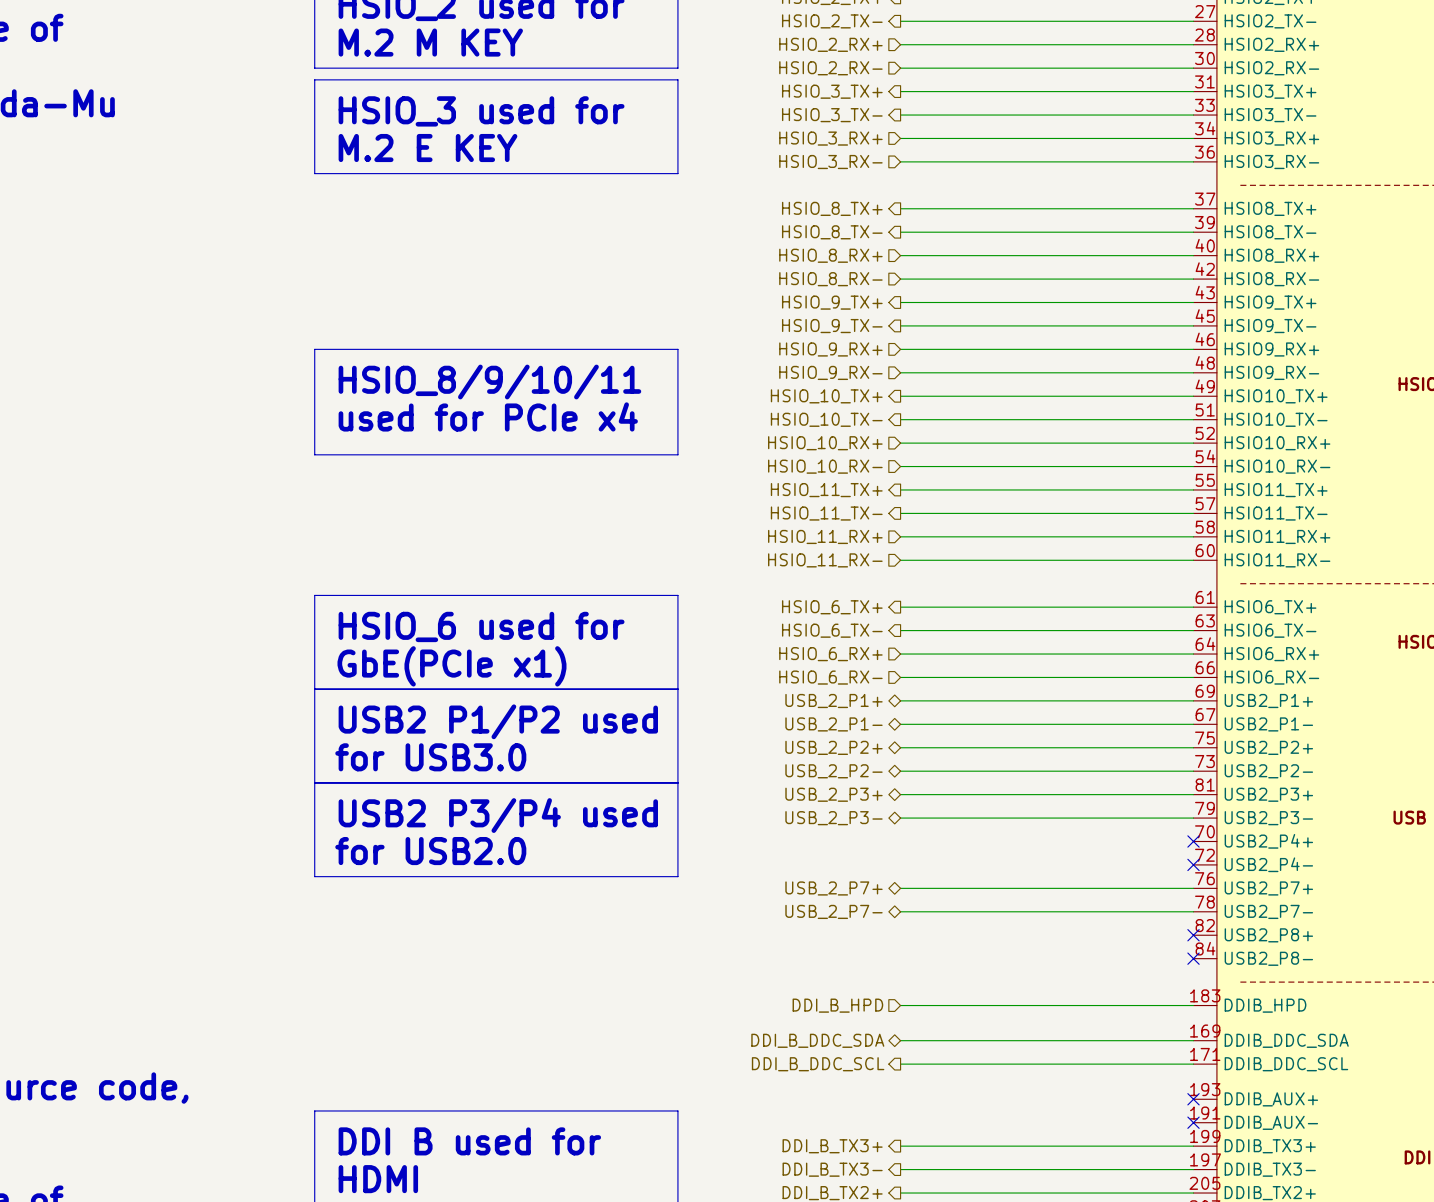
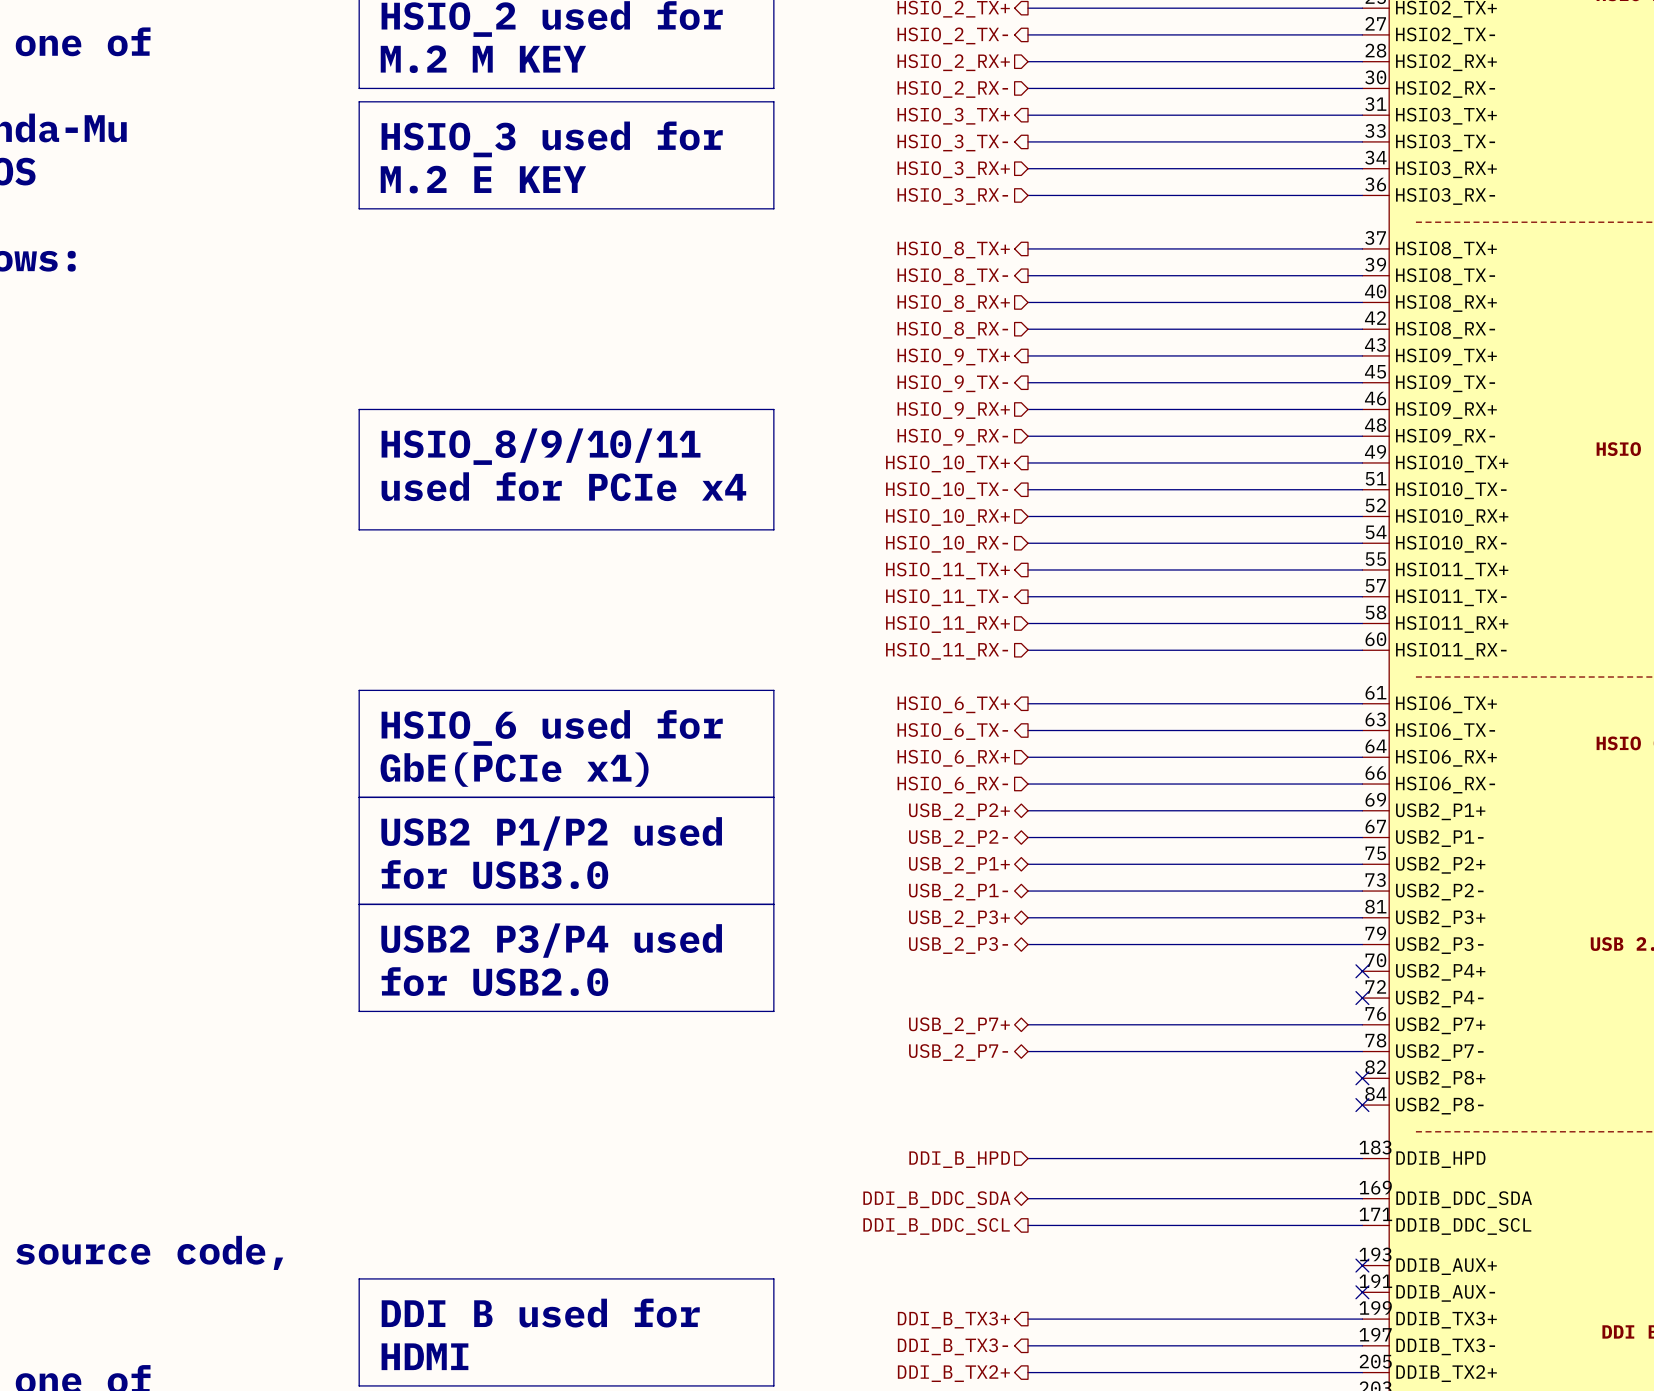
hierarchical label: USB_2_P1+ (833, 701) -> USB_2_P2+ (959, 811)
hierarchical label: USB_2_P1- (833, 724) -> USB_2_P2- (958, 838)
hierarchical label: USB_2_P2+ (833, 747) -> USB_2_P1+ (959, 865)
hierarchical label: USB_2_P2- (833, 771) -> USB_2_P1- (958, 892)

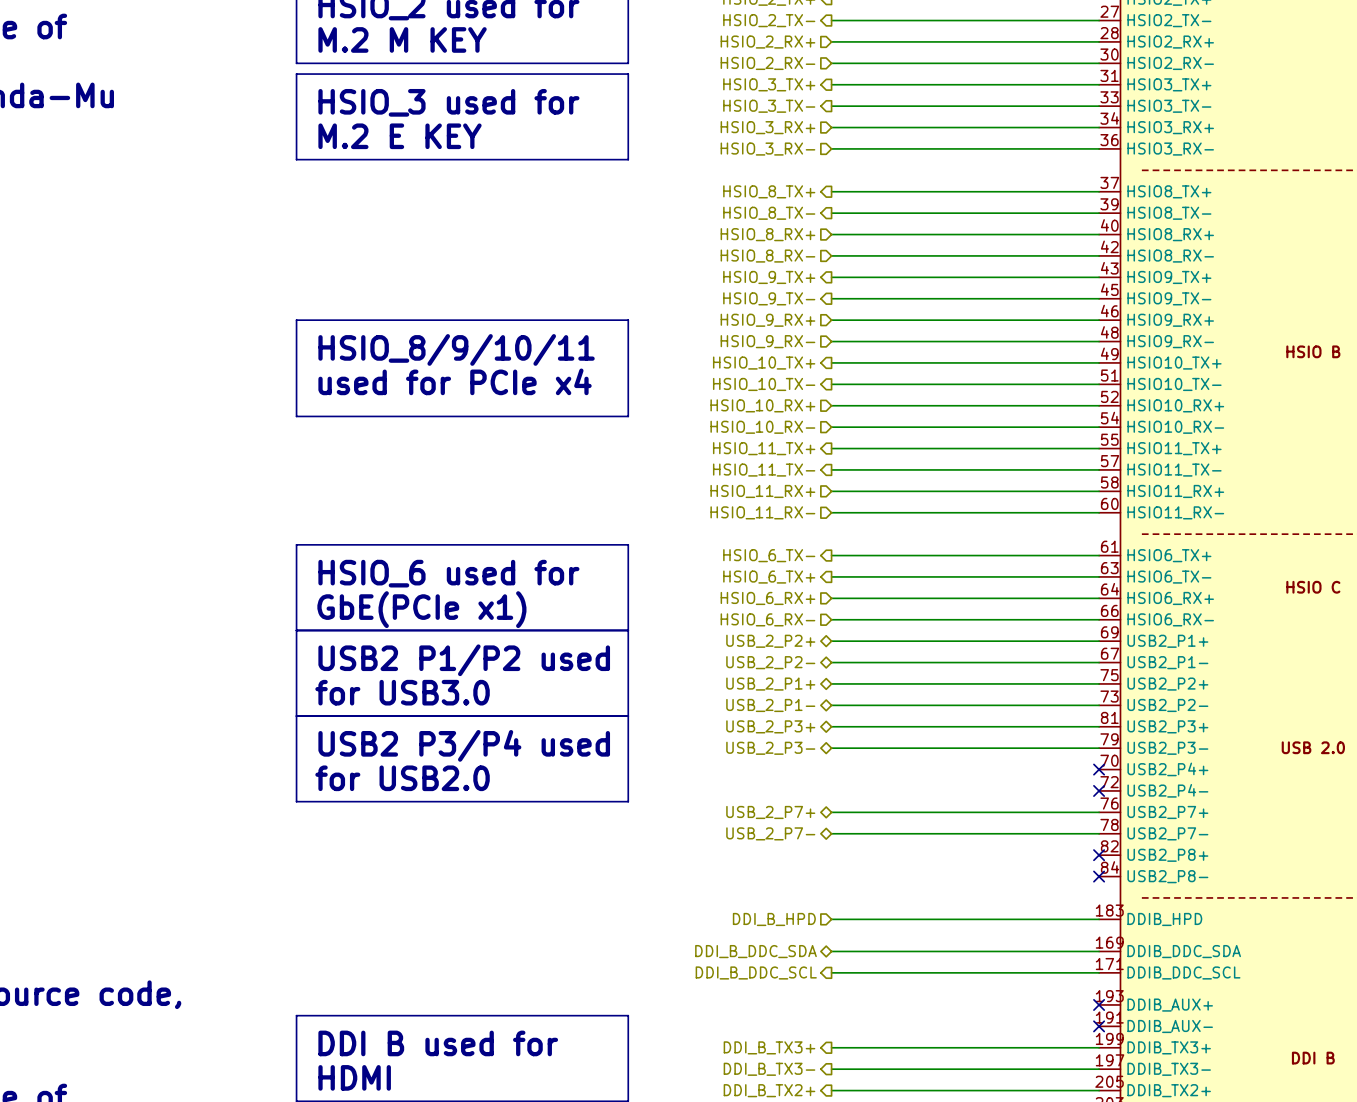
hierarchical label: HSIO_6_TX+ (953, 704) -> HSIO_6_TX- (769, 555)
hierarchical label: HSIO_6_TX- (952, 731) -> HSIO_6_TX+ (769, 577)

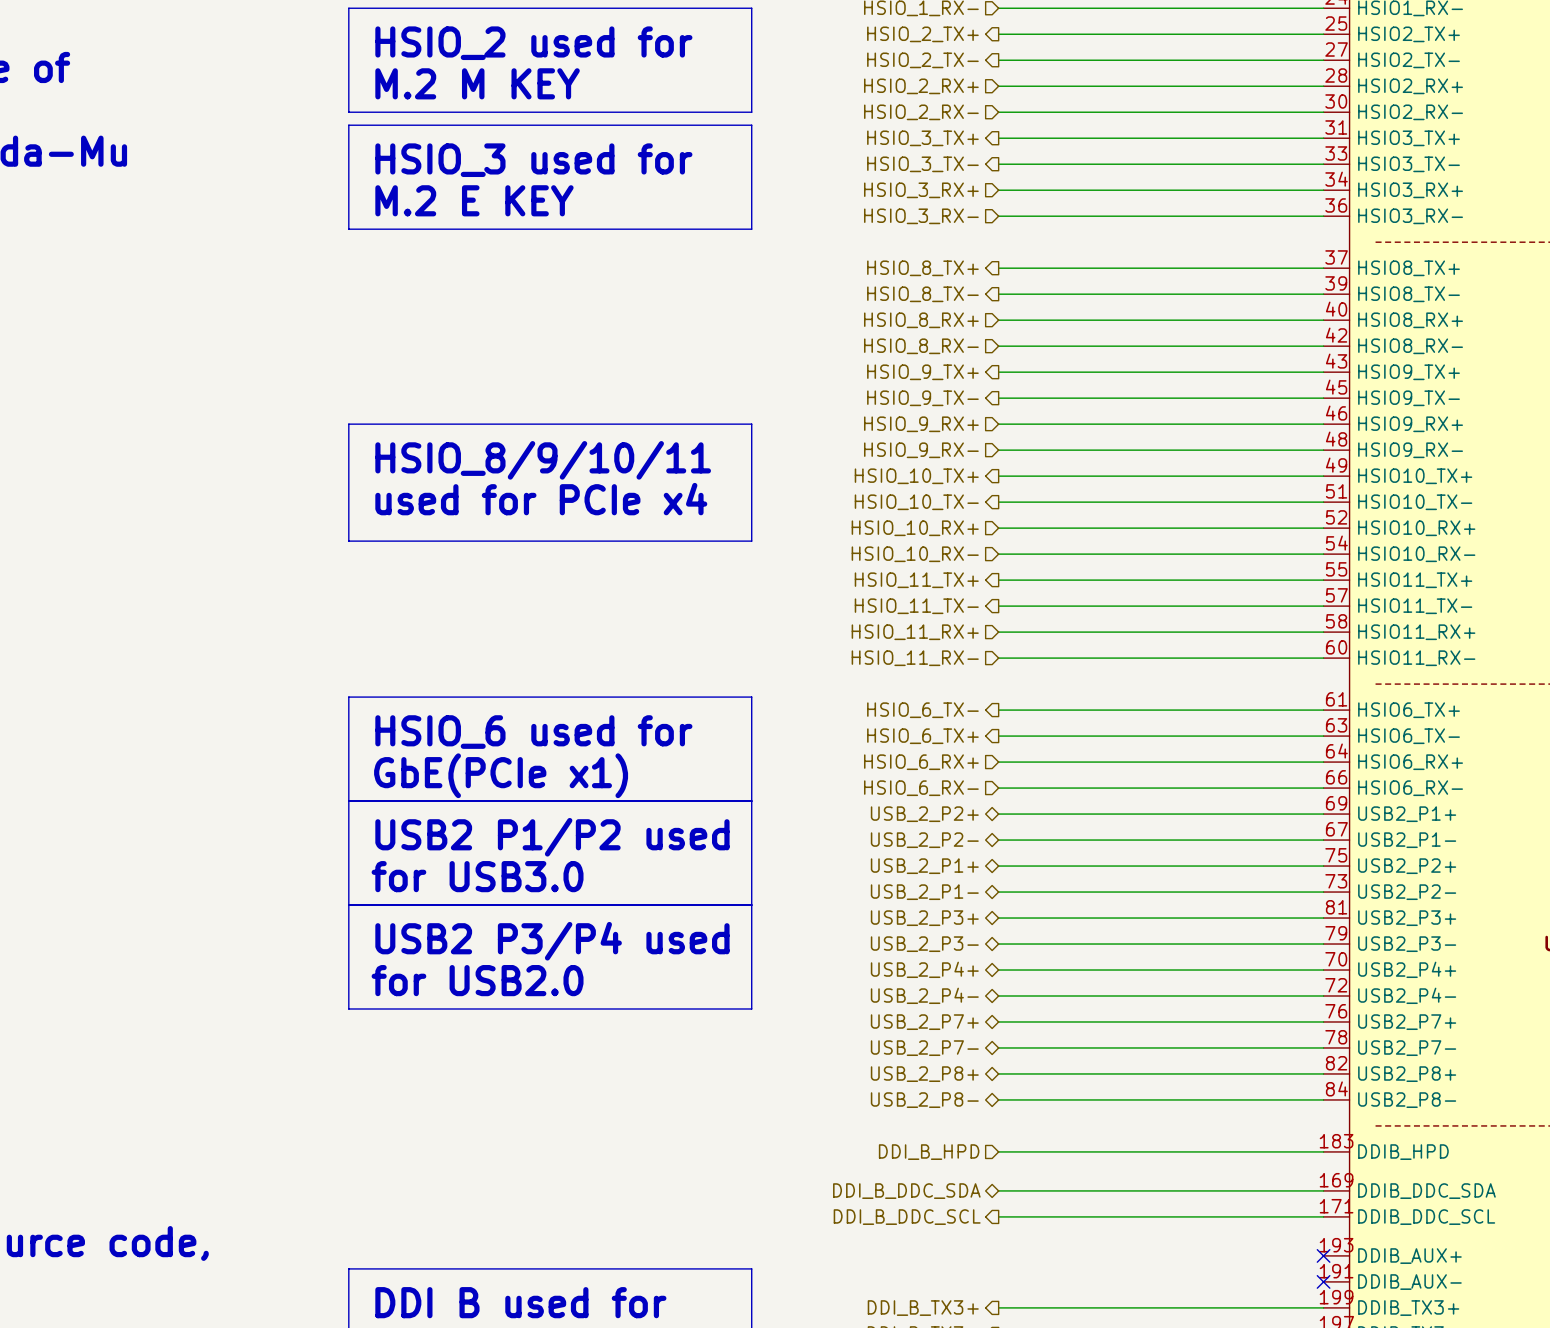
hierarchical label: none -> USB_2_P4+ (924, 969)
wire: none -> (998, 970) (1323, 970)
no-connect mark: (1099, 769) -> none
hierarchical label: none -> USB_2_P4- (924, 995)
wire: none -> (998, 996) (1323, 996)
no-connect mark: (1099, 790) -> none
hierarchical label: none -> USB_2_P8+ (924, 1074)
wire: none -> (998, 1073) (1323, 1073)
no-connect mark: (1099, 855) -> none
hierarchical label: none -> USB_2_P8- (924, 1100)
wire: none -> (998, 1099) (1323, 1099)
no-connect mark: (1099, 876) -> none

